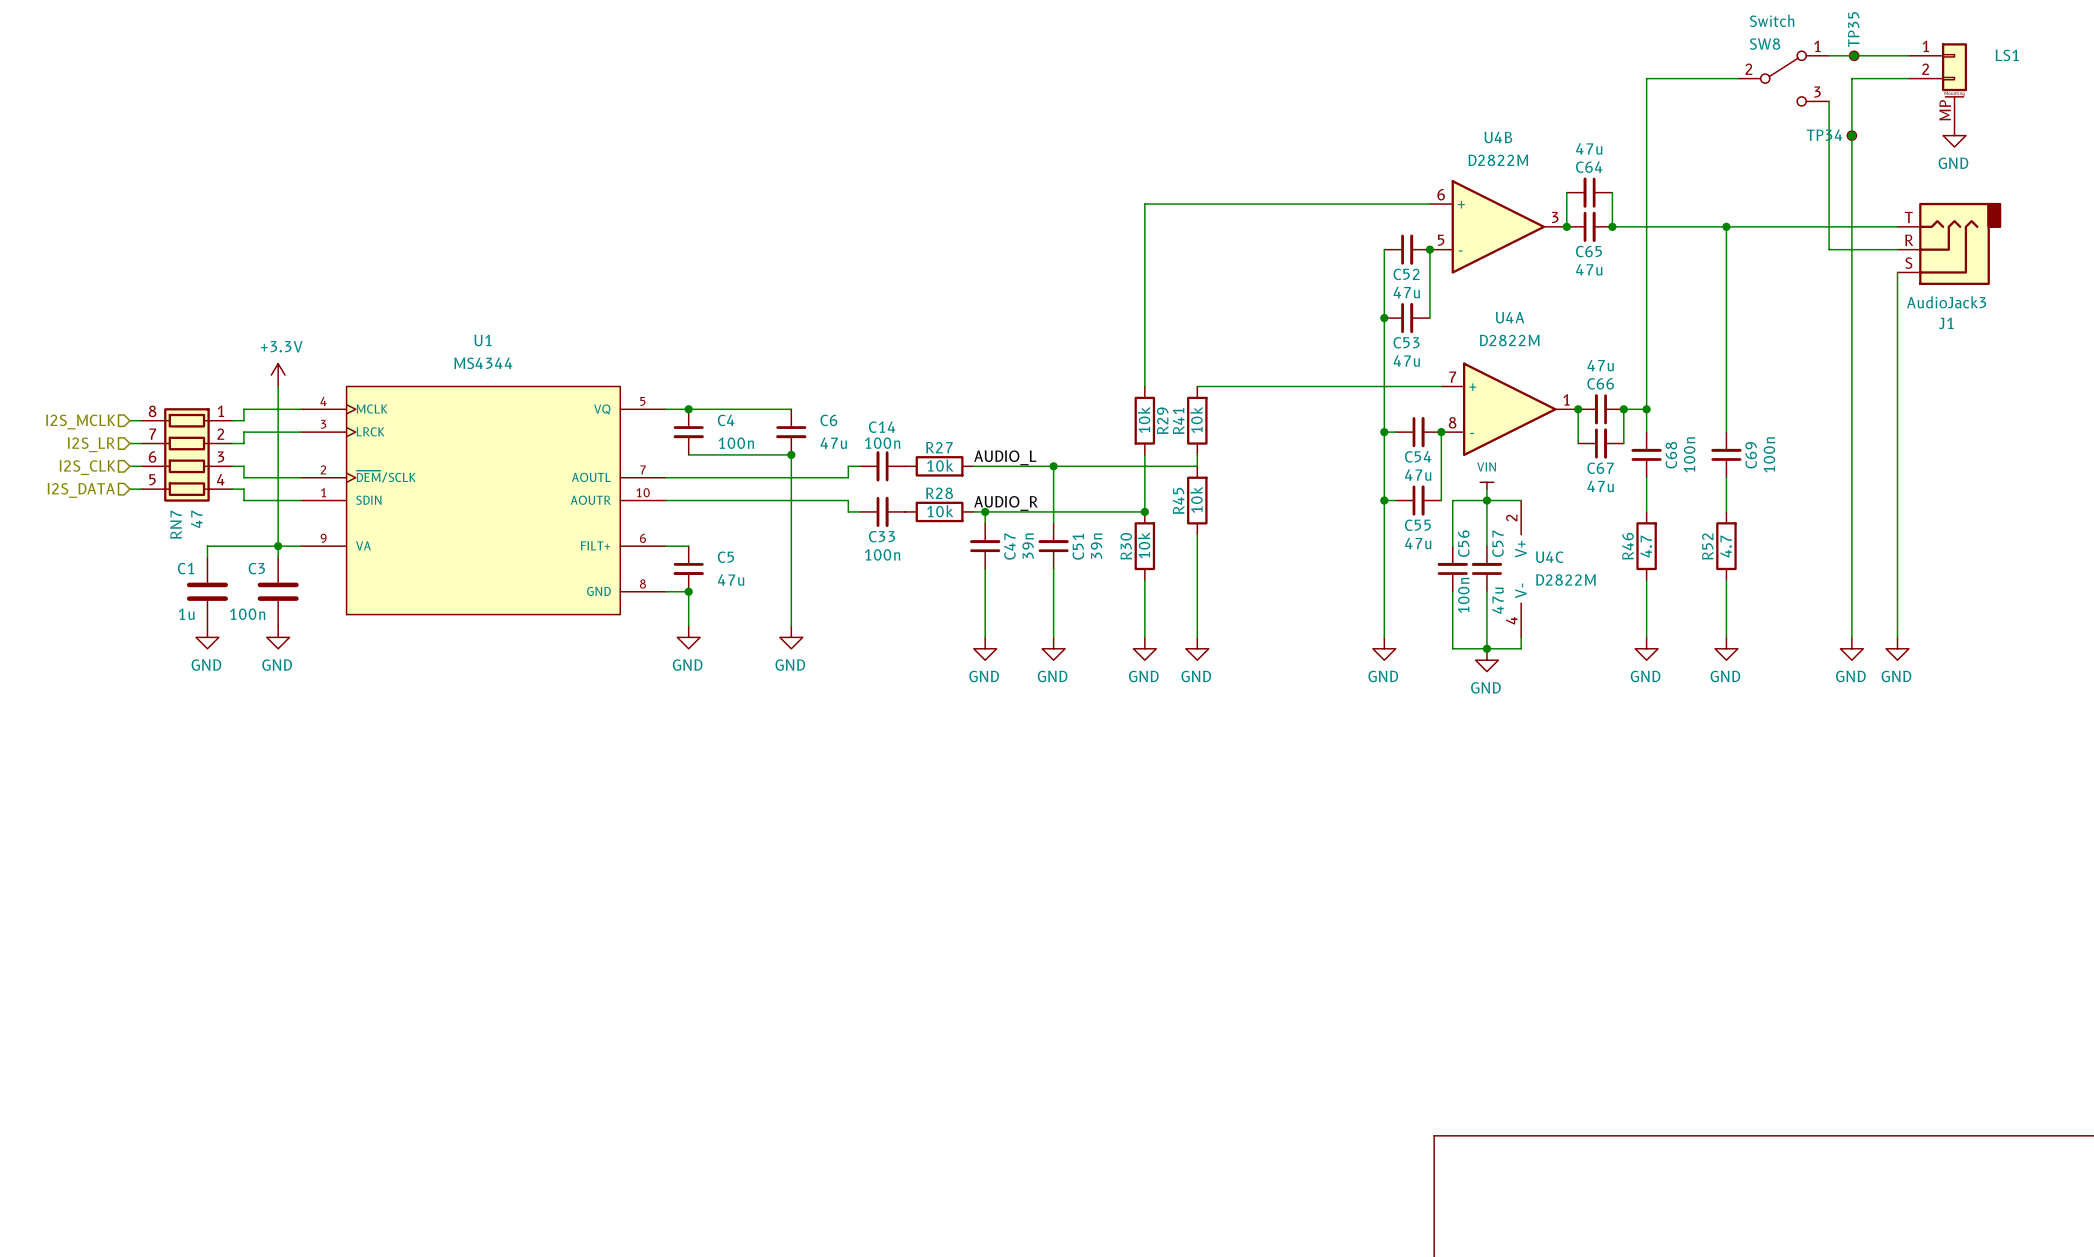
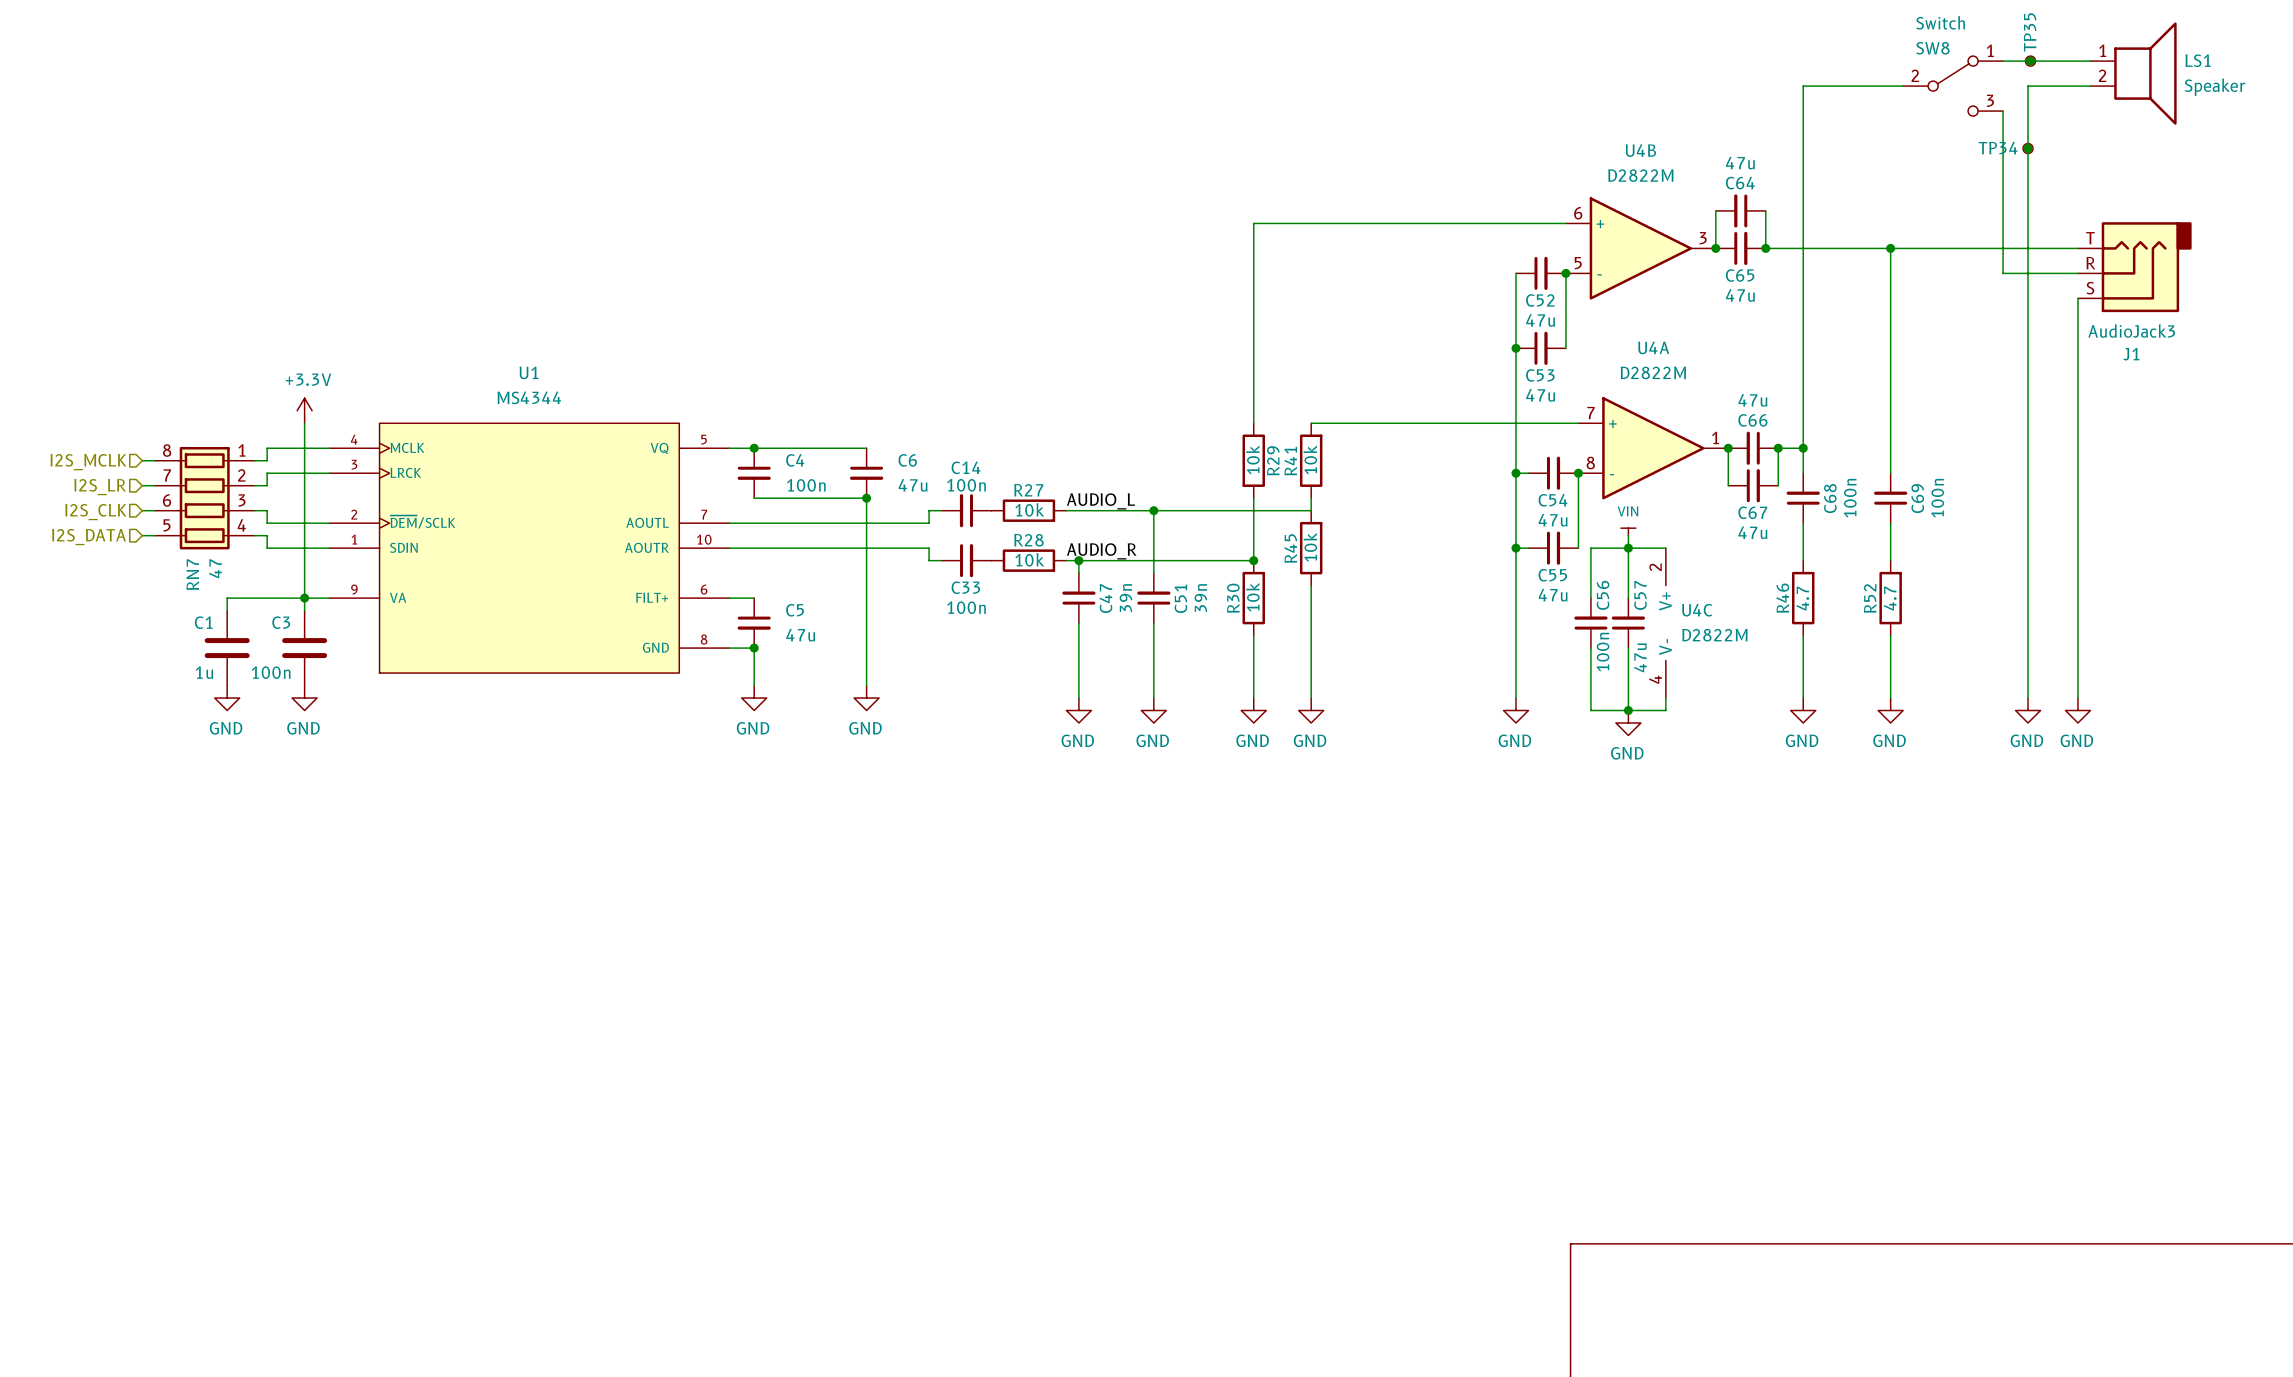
LS1 symbol: [1908, 43, 1968, 125] -> [2090, 22, 2177, 125]
LS1 value: none -> Speaker (2215, 87)
power symbol: GND (1954, 135) -> none

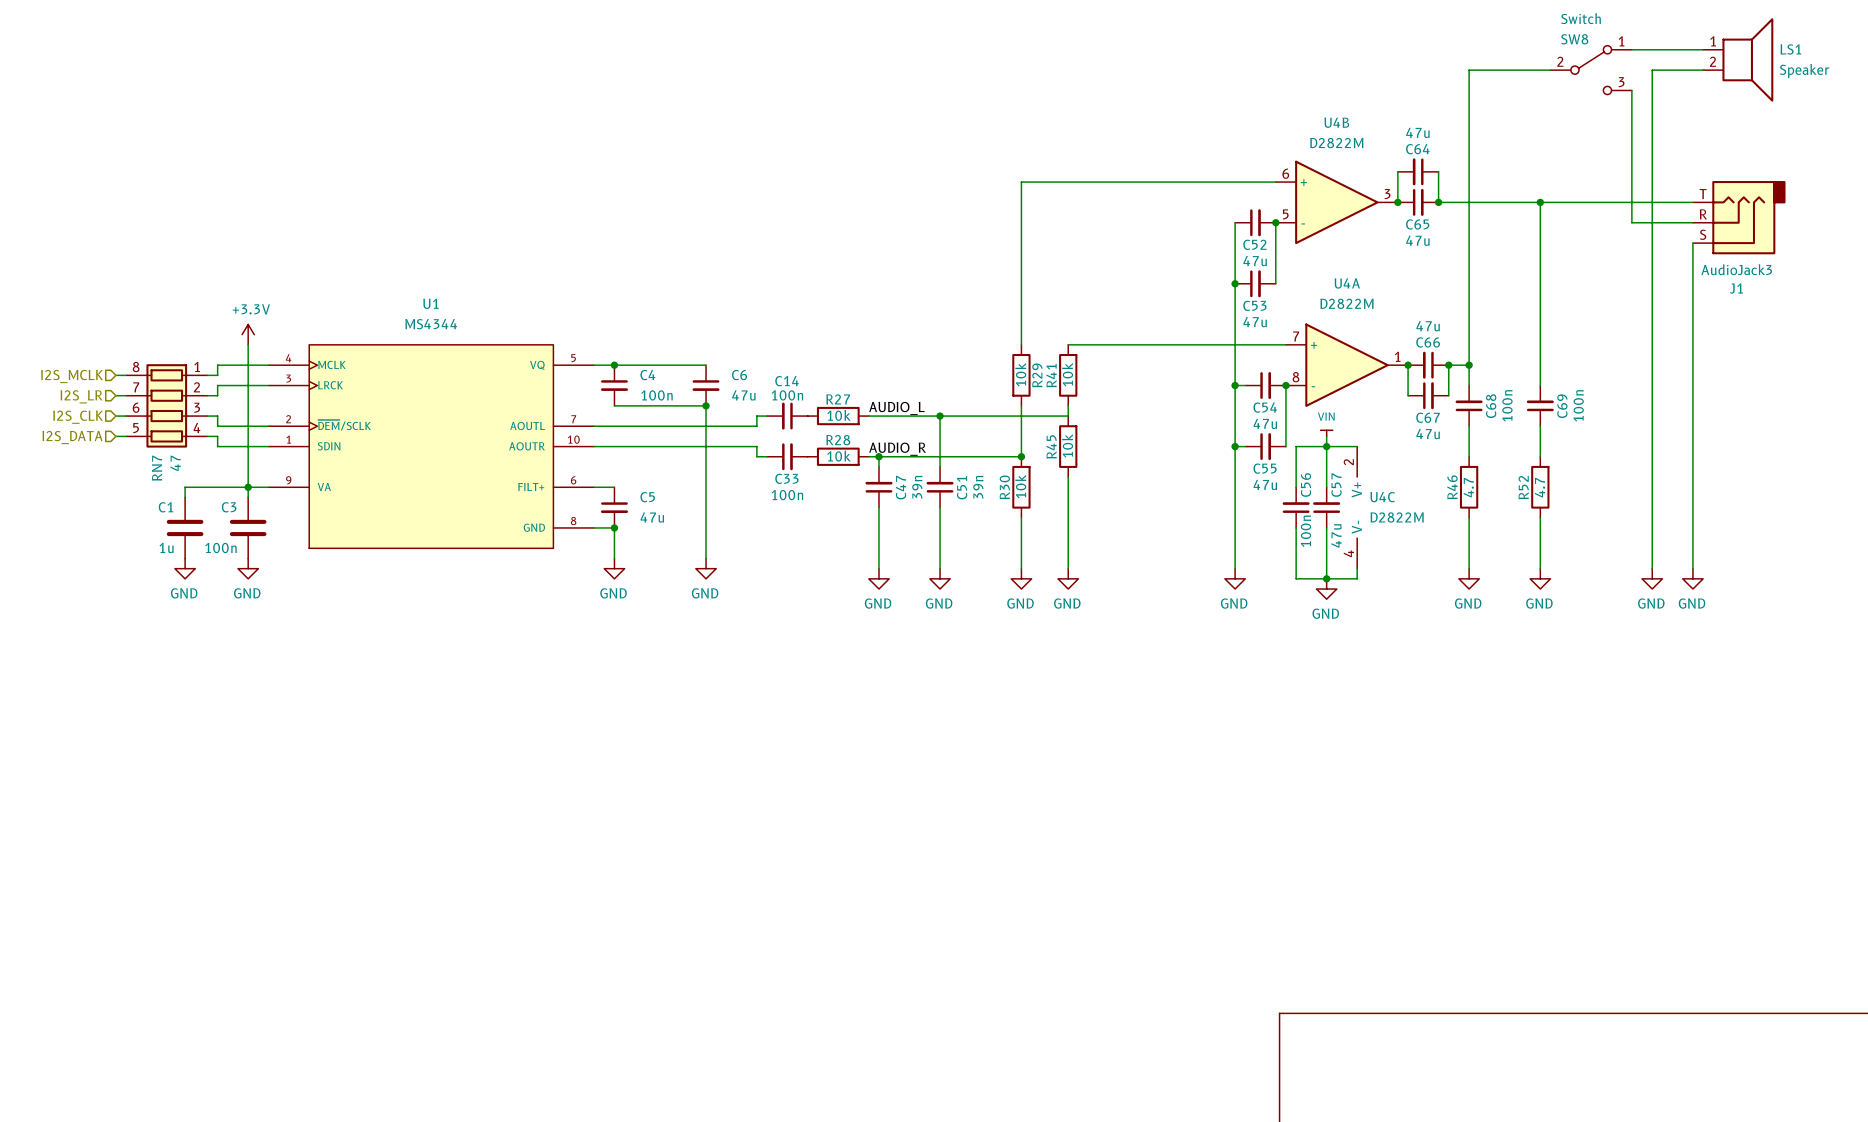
junction: (2030, 61) -> none
TP35: (2030, 61) -> none
junction: (2028, 148) -> none
TP34: (2028, 148) -> none

